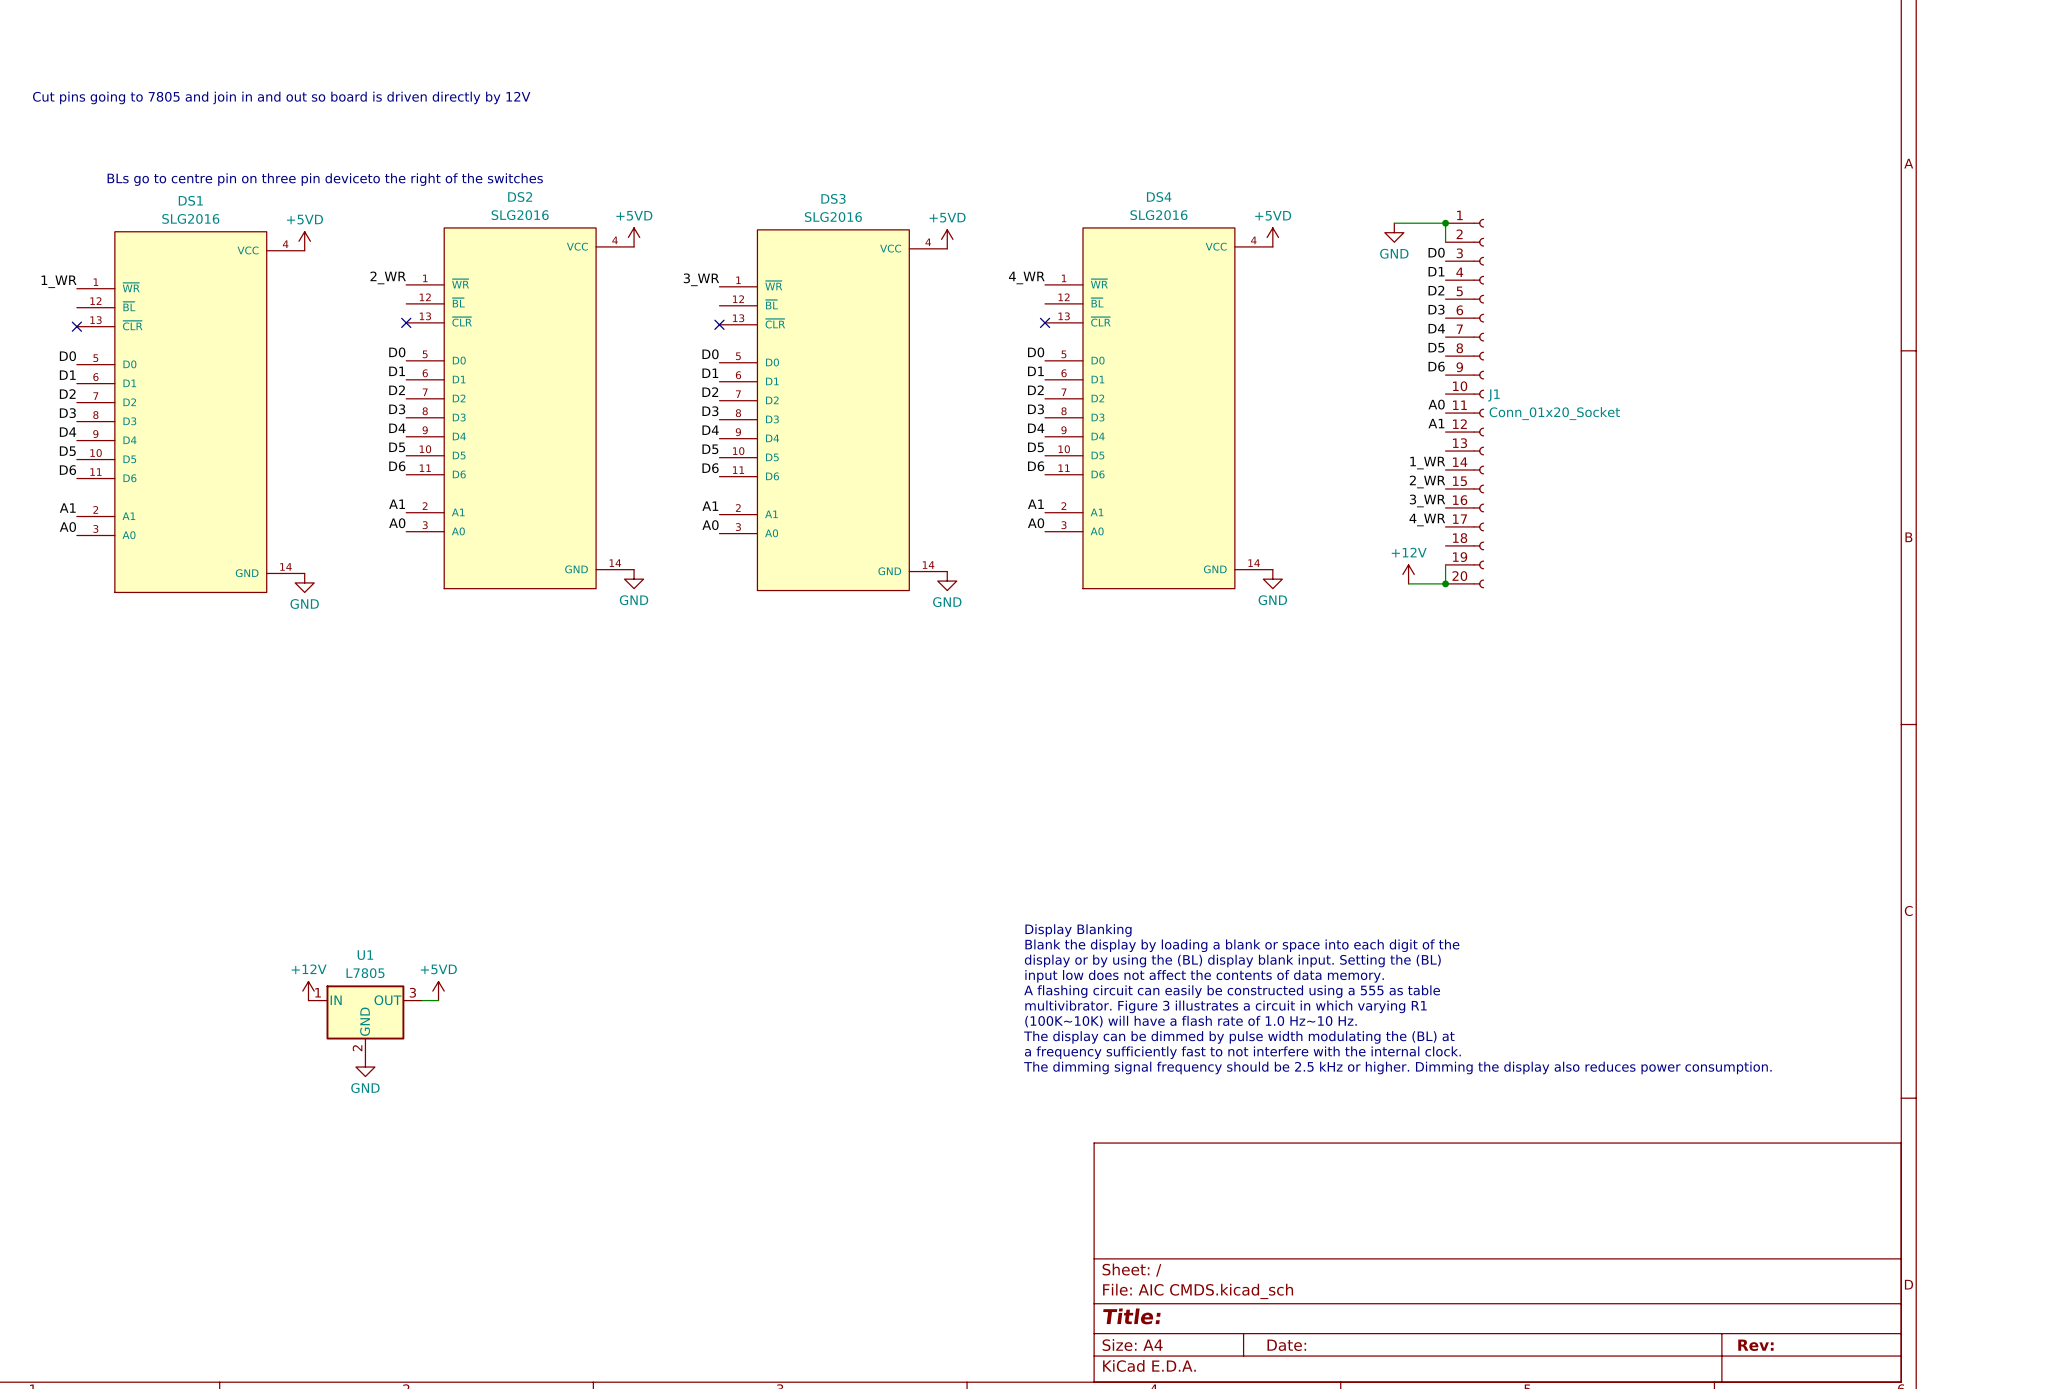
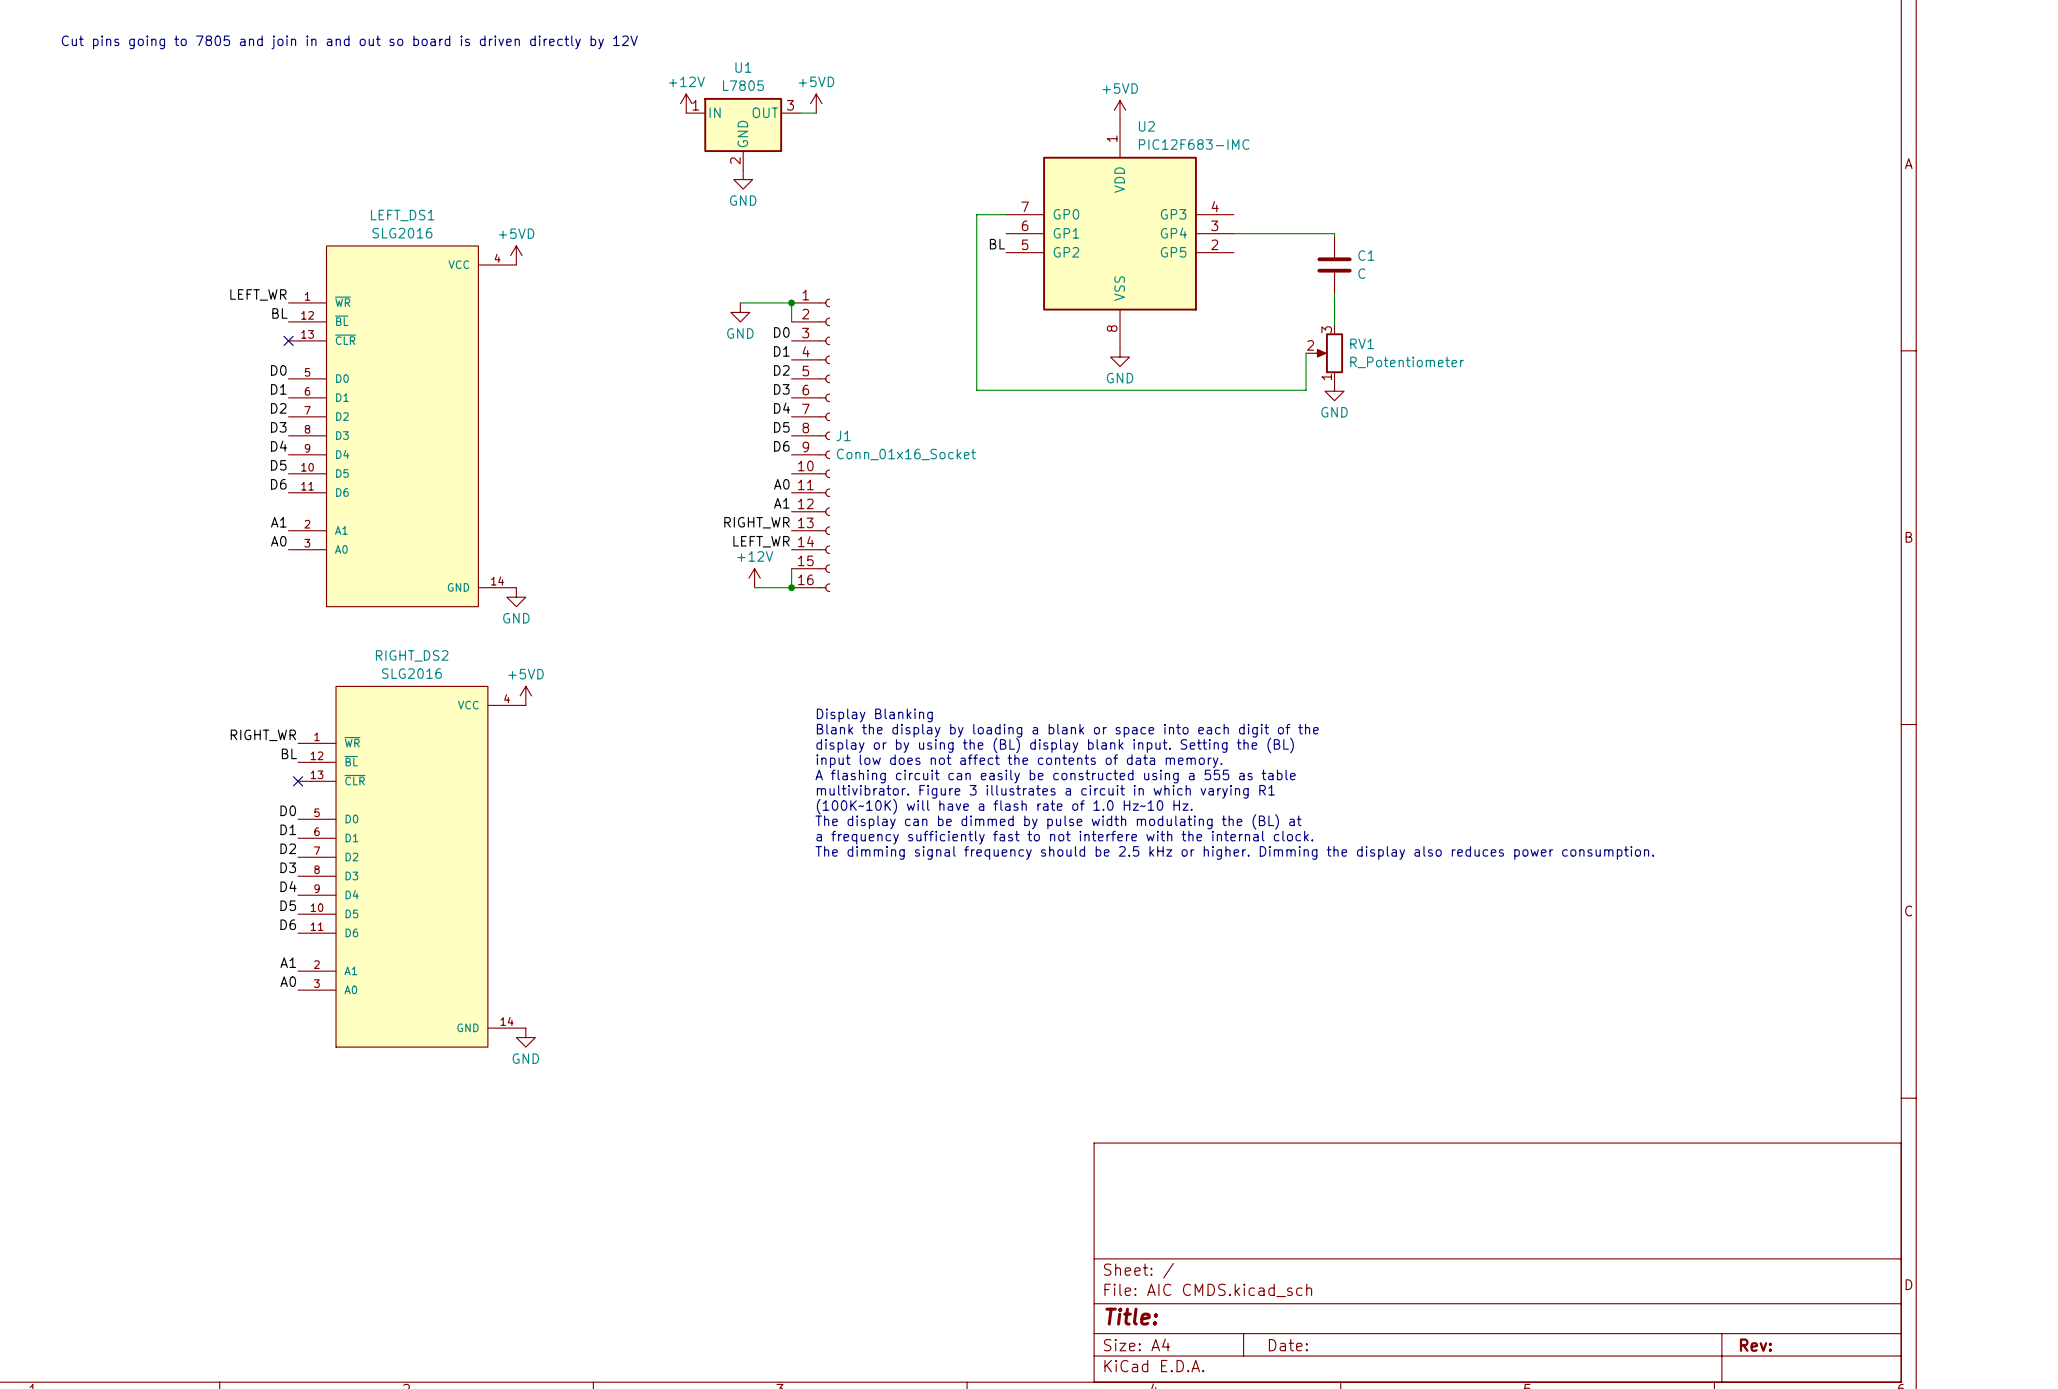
text position: Cut pins going to 7805 and join in and out so board is driven directly by 12V (281, 97) -> Cut pins going to 7805 and join in and out so board is driven directly by 12V (349, 42)
power symbol: none -> +12V (686, 103)
power symbol: none -> +5VD (816, 103)
power symbol: none -> +5VD (1120, 110)
wire: none -> (800, 113) (816, 113)
text: BLs go to centre pin on three pin deviceto the right of the switches (325, 179) -> none
power symbol: none -> GND (743, 179)
wire: none -> (1006, 214) (976, 214) (976, 390) (1306, 390) (1306, 353)
J1 symbol: [1445, 218, 1485, 589] -> [791, 298, 831, 593]
wire: (1394, 223) (1445, 223) (1445, 242) -> none
junction: (1445, 223) -> none
power symbol: GND (1394, 232) -> none
U2: none -> PIC12F683-IMC (1120, 233)
wire: none -> (1233, 233) (1334, 233) (1334, 236)
power symbol: +5VD (634, 237) -> none
power symbol: +5VD (1272, 237) -> none
power symbol: +5VD (947, 239) -> none
power symbol: +5VD (304, 241) -> none
label: none -> BL (997, 244)
label: D0 (1436, 252) -> none
power symbol: none -> +5VD (516, 255)
C1: none -> C (1334, 264)
label: D1 (1436, 271) -> none
label: 2_WR (388, 277) -> none
label: 4_WR (1026, 277) -> none
label: 3_WR (701, 279) -> none
label: 1_WR (59, 281) -> none
label: D2 (1436, 290) -> none
wire: none -> (1334, 293) (1334, 324)
label: none -> LEFT_WR (258, 294)
junction: none -> (791, 302)
label: D3 (1436, 309) -> none
power symbol: none -> GND (740, 312)
label: none -> BL (279, 313)
no-connect mark: (406, 322) -> none
no-connect mark: (1045, 322) -> none
no-connect mark: (719, 324) -> none
no-connect mark: (76, 326) -> none
label: D4 (1436, 328) -> none
no-connect mark: none -> (288, 340)
label: D5 (1436, 347) -> none
label: D0 (397, 352) -> none
label: D0 (1036, 352) -> none
RV1: none -> R_Potentiometer (1324, 353)
label position: D0 (710, 354) -> D0 (781, 332)
label: D0 (67, 356) -> none
power symbol: none -> GND (1120, 357)
label: D6 (1436, 366) -> none
label: none -> D0 (278, 370)
label: D1 (397, 371) -> none
label: D1 (1035, 371) -> none
label position: D1 (710, 373) -> D1 (781, 351)
label: D1 (67, 375) -> none
label: none -> D1 (278, 389)
label: D2 (397, 390) -> none
label: D2 (1035, 390) -> none
power symbol: none -> GND (1334, 391)
label position: D2 (710, 392) -> D2 (781, 370)
label: D2 (67, 394) -> none
label: A0 (1436, 404) -> none
label: none -> D2 (278, 408)
DS2: SLG2016 (520, 408) -> none
DS4: SLG2016 (1158, 408) -> none
label: D3 (397, 409) -> none
label: D3 (1035, 409) -> none
DS3: SLG2016 (833, 410) -> none
label position: D3 (710, 411) -> D3 (781, 389)
DS1: SLG2016 (190, 412) -> none
label: D3 (67, 413) -> none
J1 value: Conn_01x20_Socket (1554, 413) -> Conn_01x16_Socket (906, 454)
label: A1 (1436, 423) -> none
LEFT_DS1: none -> SLG2016 (402, 426)
label: none -> D3 (278, 427)
label: D4 (397, 428) -> none
label: D4 (1036, 428) -> none
label position: D4 (710, 430) -> D4 (782, 408)
label: D4 (68, 432) -> none
label: none -> D4 (278, 446)
label: D5 (397, 447) -> none
label: D5 (1035, 447) -> none
label position: D5 (710, 449) -> D5 (781, 427)
label: D5 (67, 451) -> none
label: 1_WR (1427, 463) -> none
label: none -> D5 (278, 465)
label: D6 (397, 466) -> none
label: D6 (1036, 466) -> none
label position: D6 (710, 468) -> D6 (781, 446)
label: D6 (67, 470) -> none
label: 2_WR (1427, 481) -> none
label: none -> D6 (278, 484)
label: 3_WR (1427, 500) -> none
label: A1 (397, 504) -> none
label: A1 (1035, 504) -> none
label position: A1 (710, 506) -> A1 (781, 503)
label: A1 (67, 508) -> none
label: 4_WR (1427, 520) -> none
label: none -> A1 (278, 522)
label: A0 (397, 523) -> none
label: none -> RIGHT_WR (756, 522)
label: A0 (1036, 523) -> none
label position: A0 (710, 525) -> A0 (781, 484)
label: A0 (67, 527) -> none
label: none -> A0 (278, 541)
label: none -> LEFT_WR (761, 541)
wire: (1445, 564) (1445, 583) (1408, 583) -> none
power symbol: +12V (1408, 574) -> none
power symbol: none -> +12V (754, 578)
power symbol: GND (634, 579) -> none
power symbol: GND (1272, 579) -> none
power symbol: GND (947, 581) -> none
power symbol: GND (304, 582) -> none
junction: (1445, 583) -> none
junction: none -> (791, 587)
power symbol: none -> GND (516, 597)
power symbol: none -> +5VD (525, 695)
text: none -> Display Blanking (874, 715)
text: none -> Blank the display by loading a blank or space into each digit of the (1067, 730)
label: none -> RIGHT_WR (263, 735)
text: none -> display or by using the (BL) display blank input. Setting the (BL) (1055, 745)
label: none -> BL (289, 753)
text: none -> input low does not affect the contents of data memory. (1019, 761)
text: none -> A flashing circuit can easily be constructed using a 555 as table (1055, 776)
no-connect mark: none -> (298, 781)
text: none -> multivibrator. Figure 3 illustrates a circuit in which varying R1 (1045, 791)
text: none -> (100K~10K) will have a flash rate of 1.0 Hz~10 Hz. (1004, 806)
label: none -> D0 (288, 810)
text: none -> The display can be dimmed by pulse width modulating the (BL) at (1058, 821)
label: none -> D1 (288, 829)
text: none -> a frequency sufficiently fast to not interfere with the internal clock. (1064, 837)
label: none -> D2 (288, 848)
text: none -> The dimming signal frequency should be 2.5 kHz or higher. Dimming the display also reduces power consumption. (1234, 852)
RIGHT_DS2: none -> SLG2016 (411, 866)
label: none -> D3 (288, 867)
label: none -> D4 (288, 886)
label: none -> D5 (288, 905)
label: none -> D6 (288, 924)
text: Display Blanking (1078, 930) -> none
text: Blank the display by loading a blank or space into each digit of the (1242, 945) -> none
text: display or by using the (BL) display blank input. Setting the (BL) (1232, 961) -> none
label: none -> A1 (288, 962)
text: input low does not affect the contents of data memory. (1204, 976) -> none
label: none -> A0 (288, 981)
power symbol: +12V (308, 991) -> none
power symbol: +5VD (438, 991) -> none
text: A flashing circuit can easily be constructed using a 555 as table (1232, 991) -> none
text: multivibrator. Figure 3 illustrates a circuit in which varying R1 (1225, 1006) -> none
U1 position: (365, 1021) -> (743, 134)
text: (100K~10K) will have a flash rate of 1.0 Hz~10 Hz. (1191, 1021) -> none
text: The display can be dimmed by pulse width modulating the (BL) at (1239, 1037) -> none
text: a frequency sufficiently fast to not interfere with the internal clock. (1242, 1052) -> none
power symbol position: GND (365, 1067) -> GND (525, 1037)
text: The dimming signal frequency should be 2.5 kHz or higher. Dimming the display also reduces power consumption. (1397, 1067) -> none

